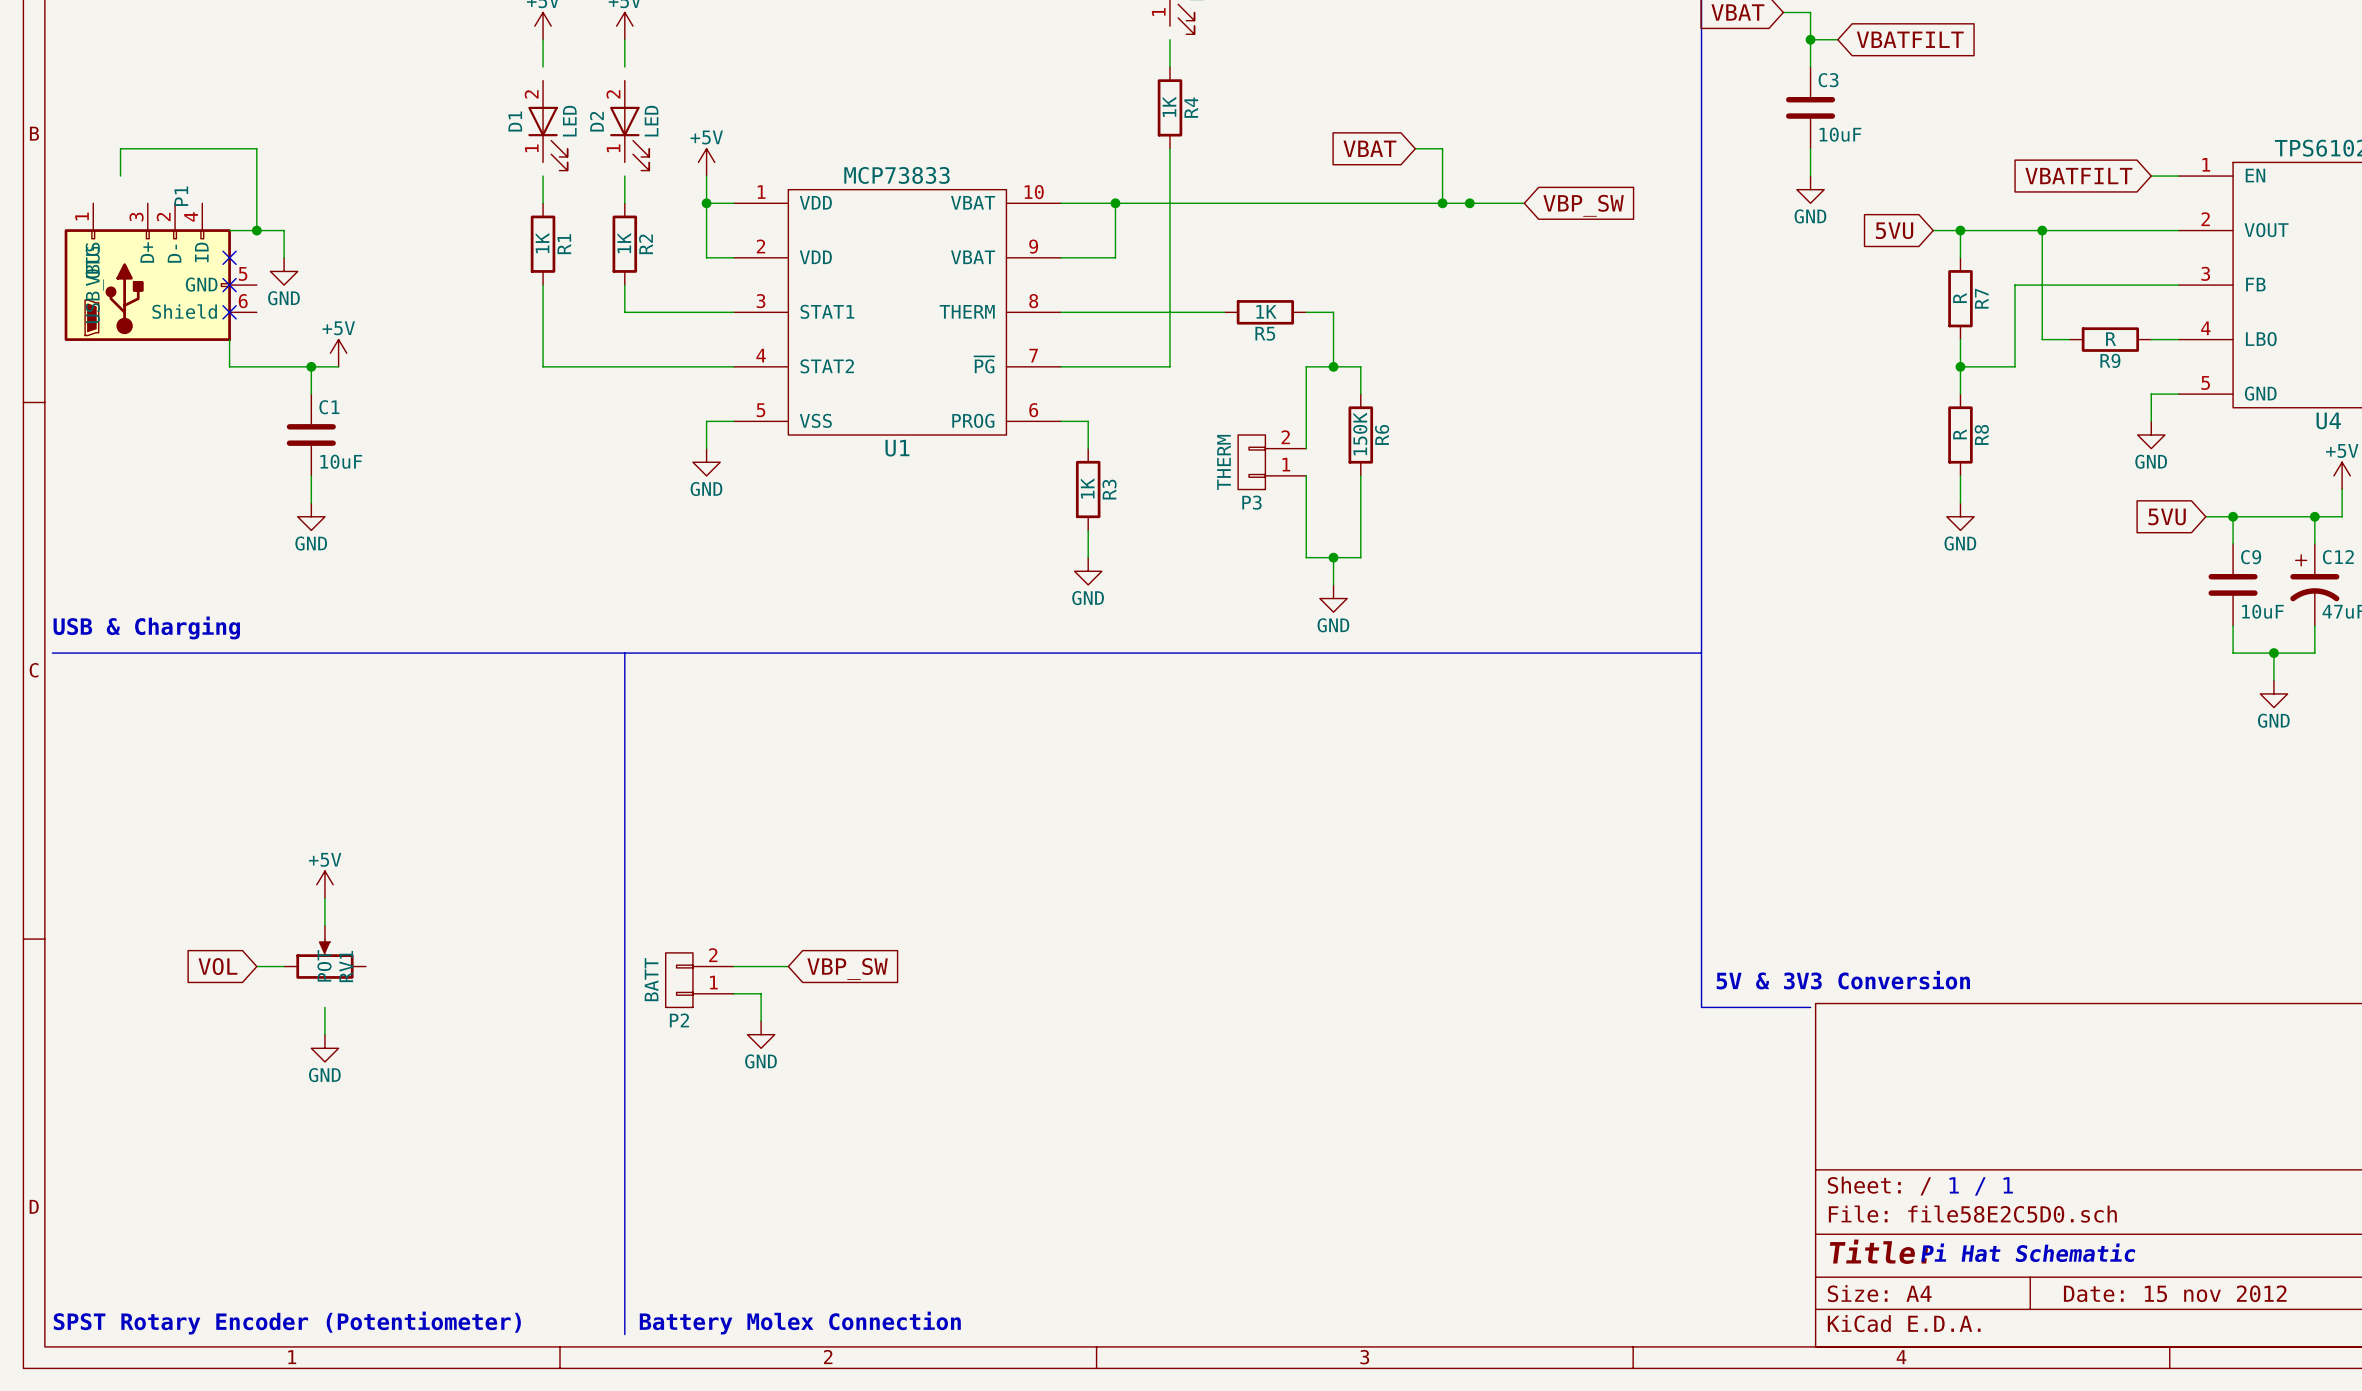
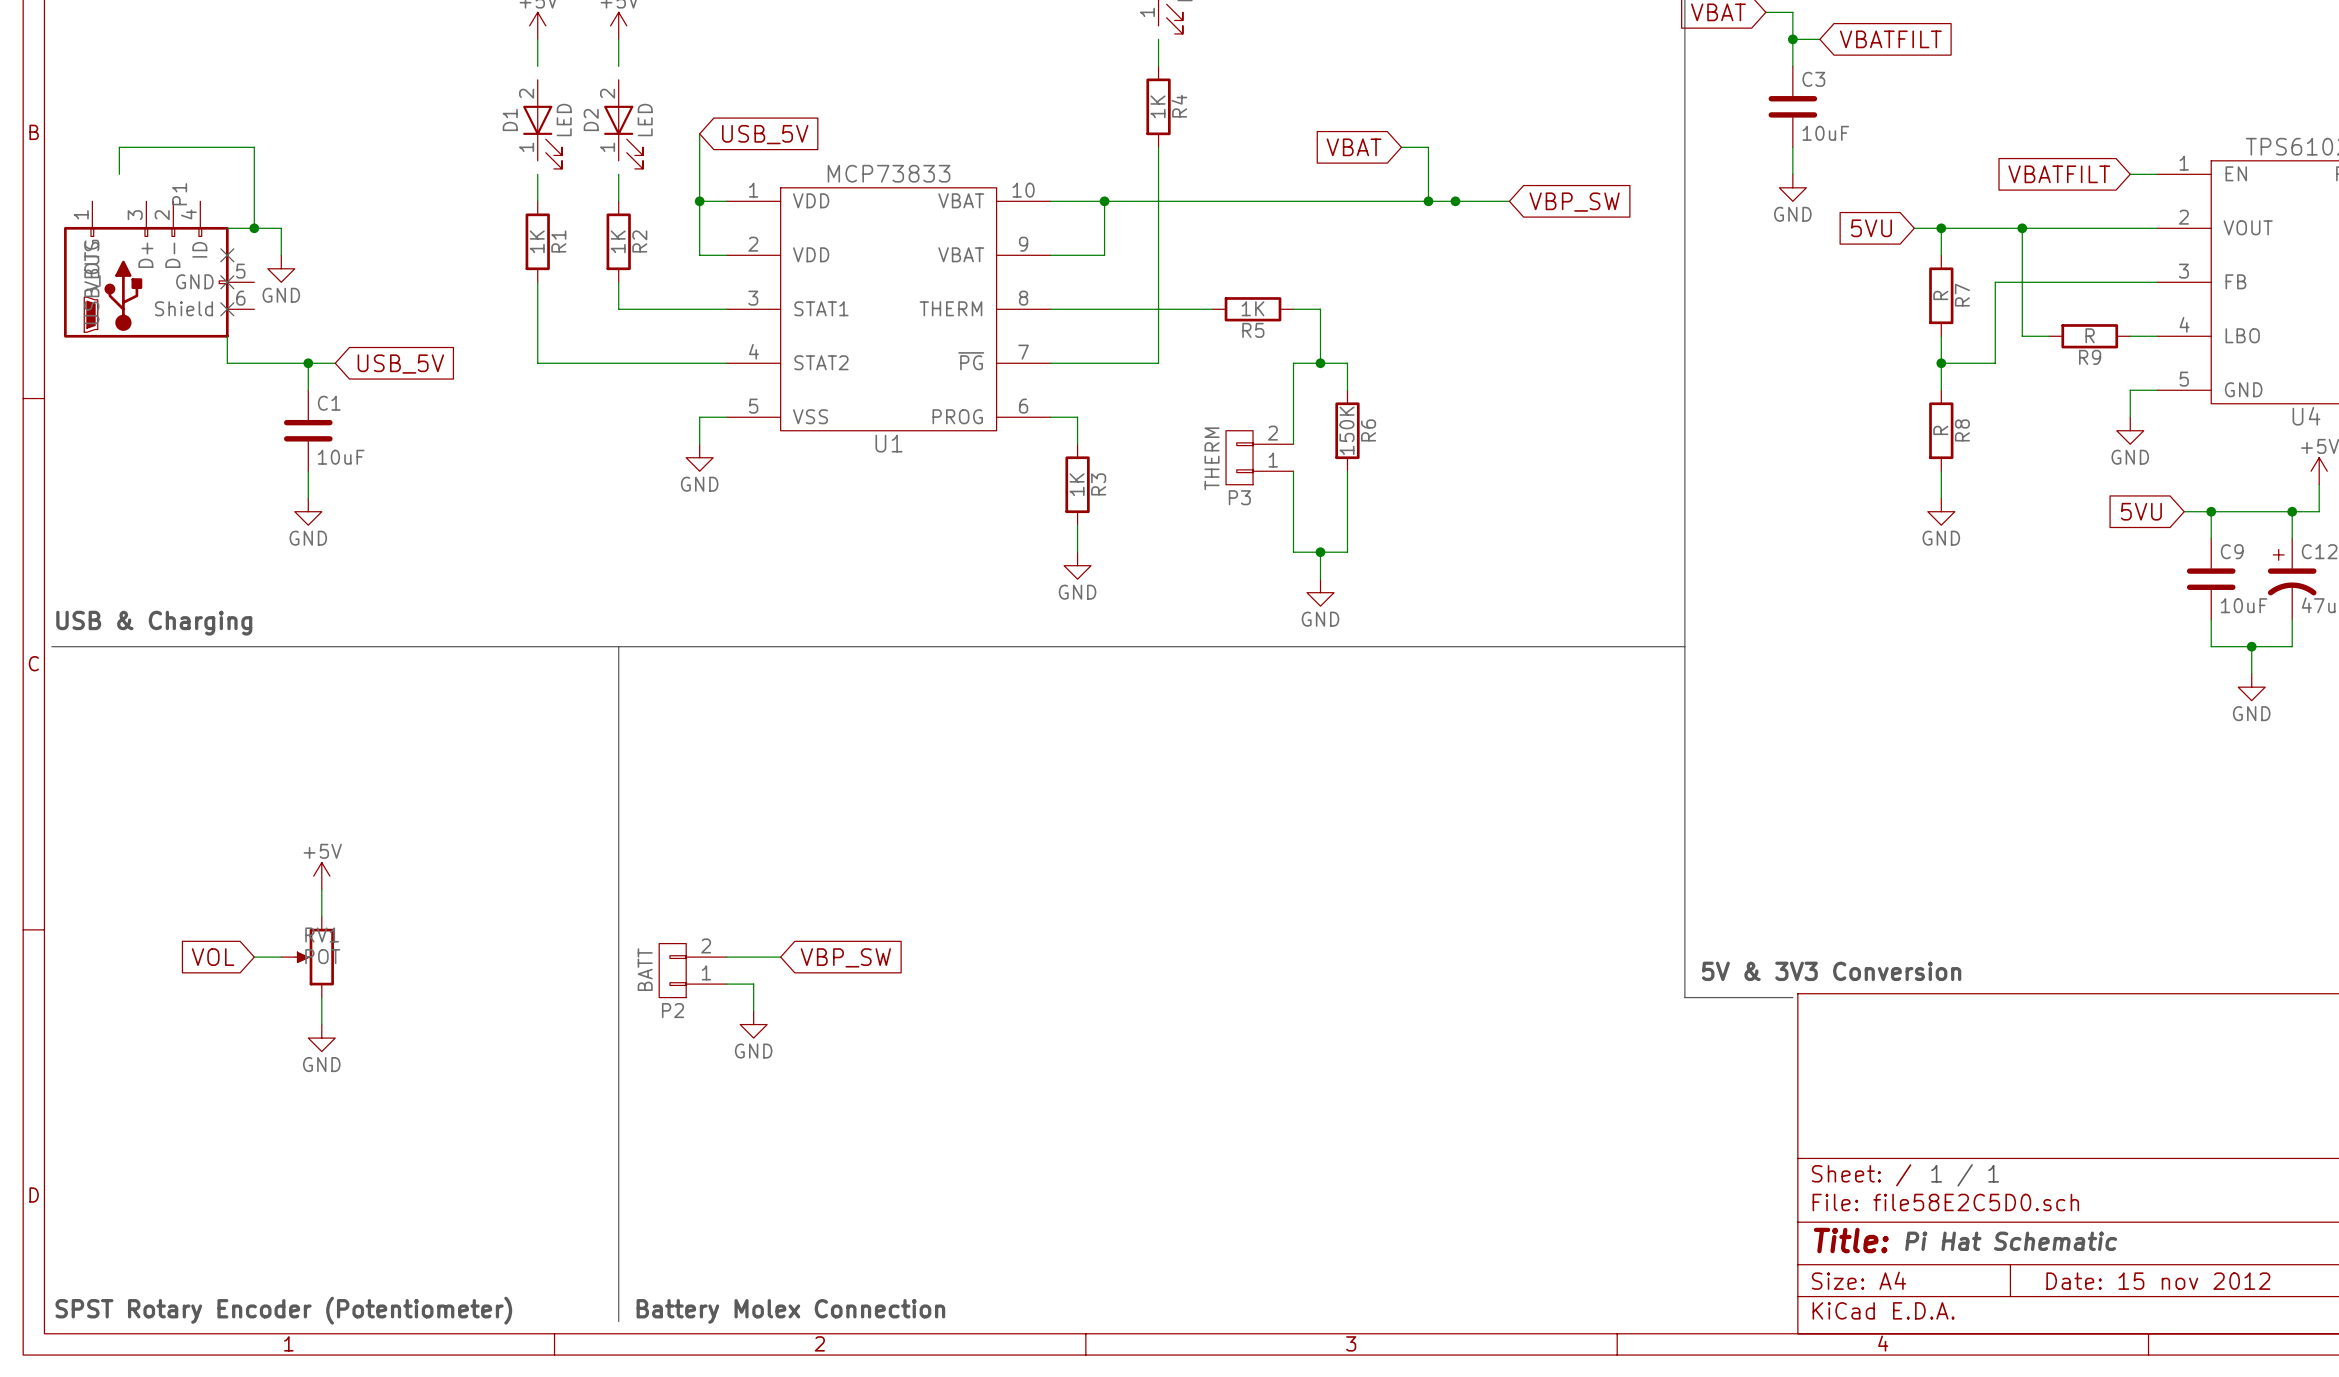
global label: none -> USB_5V (765, 134)
power symbol: +5V (706, 162) -> none
power symbol: +5V (338, 353) -> none
global label: none -> USB_5V (400, 364)
RV1 rotation: 0° (324, 959) -> 90° counterclockwise (314, 957)

